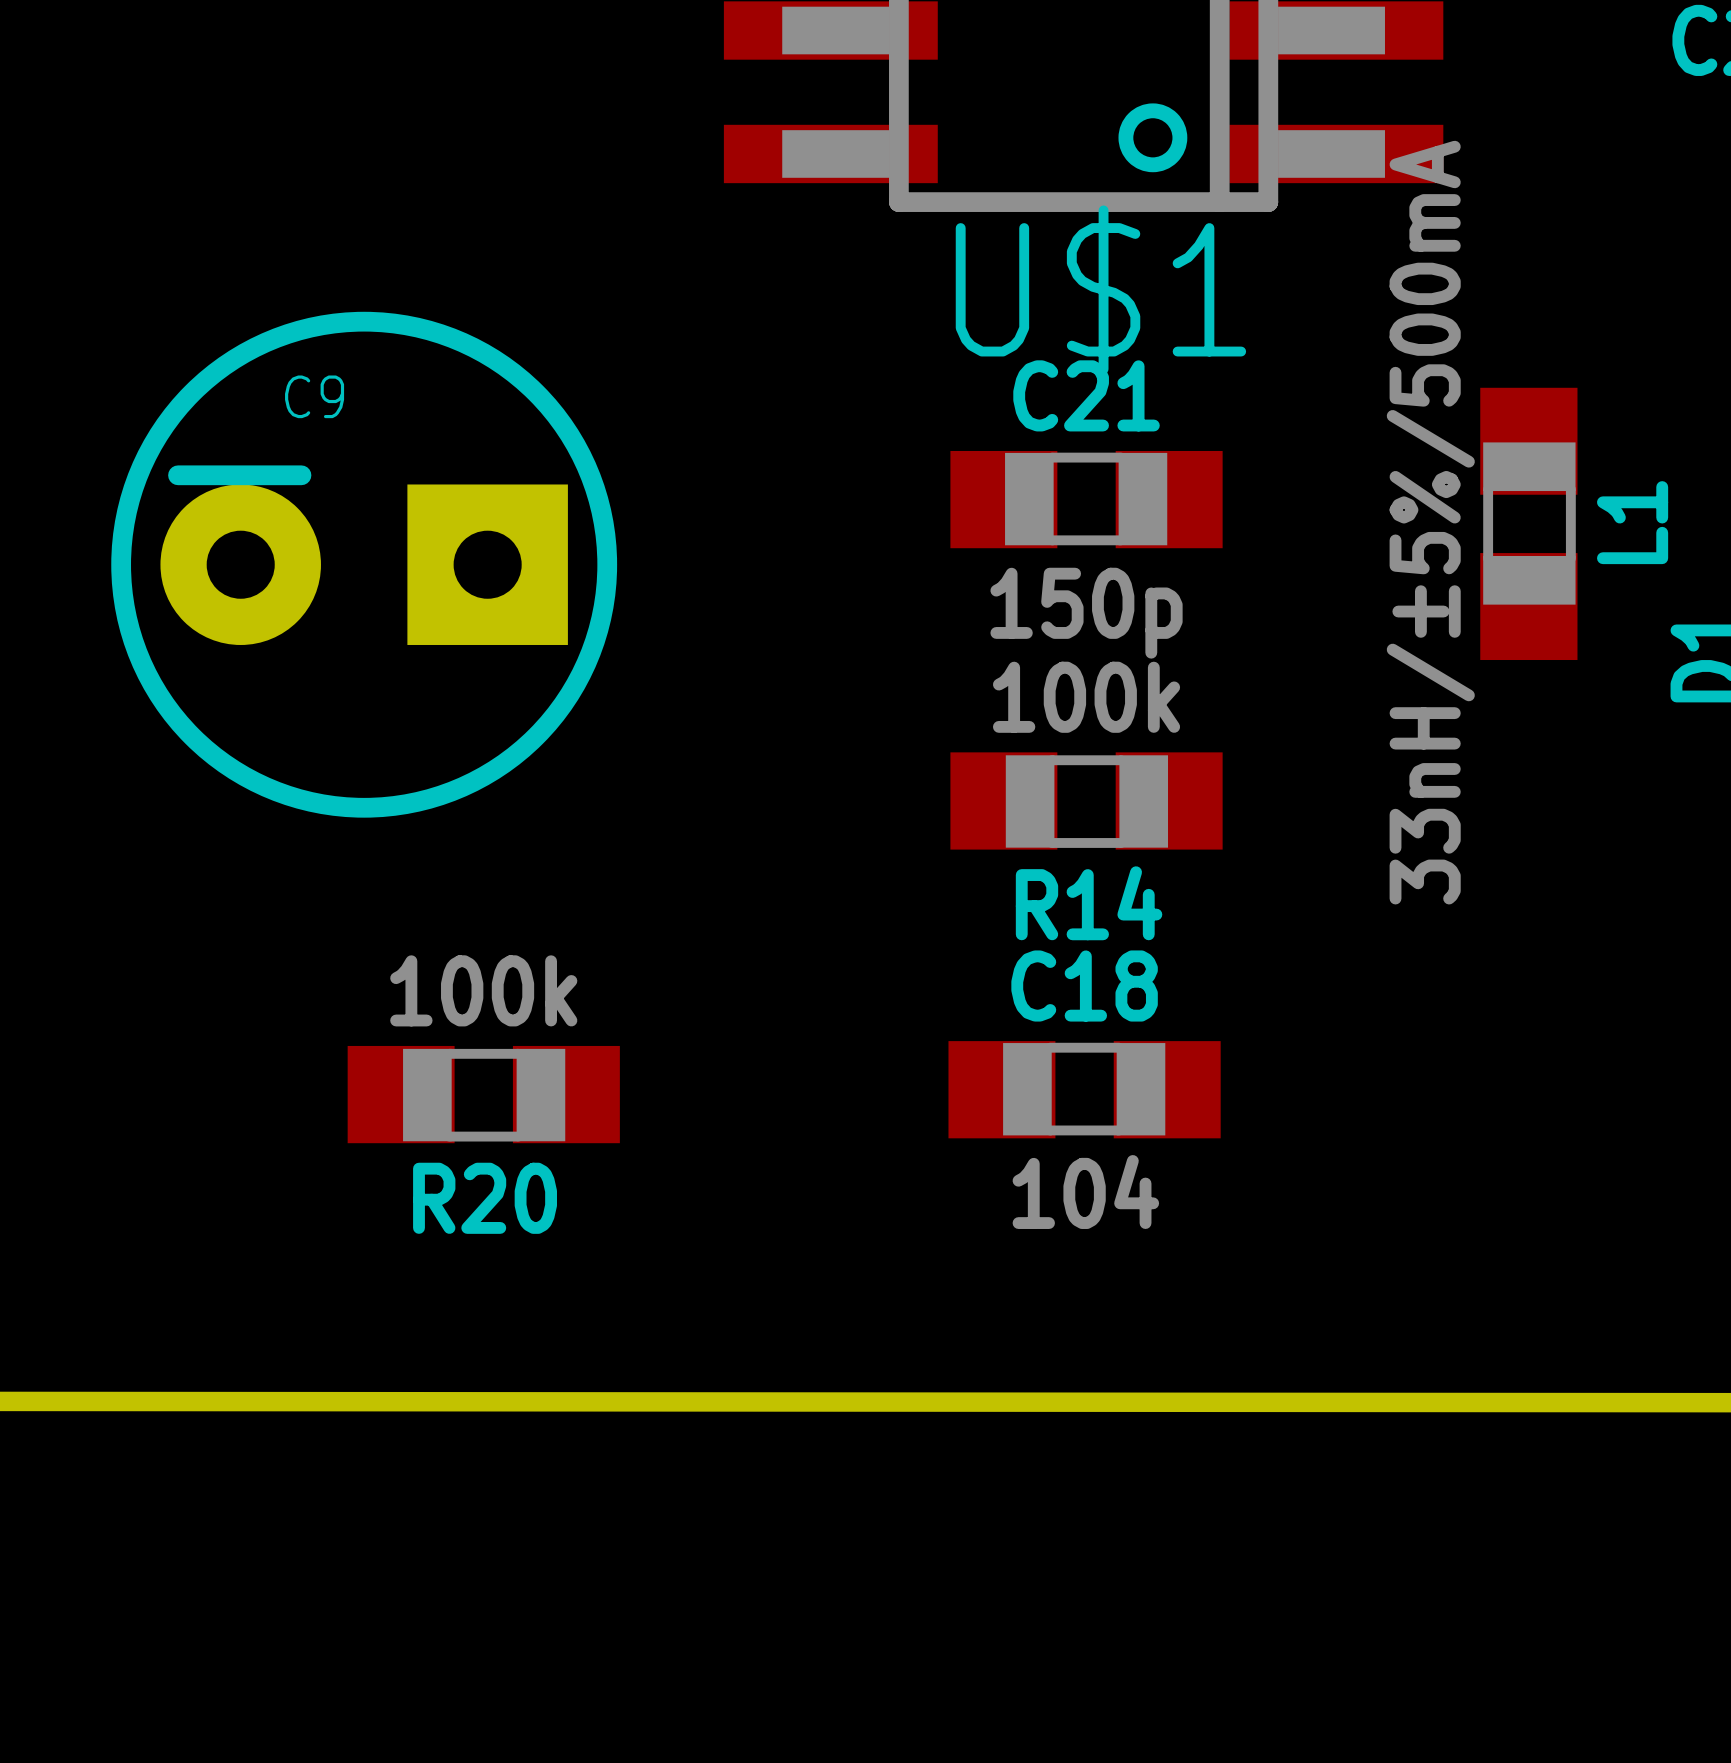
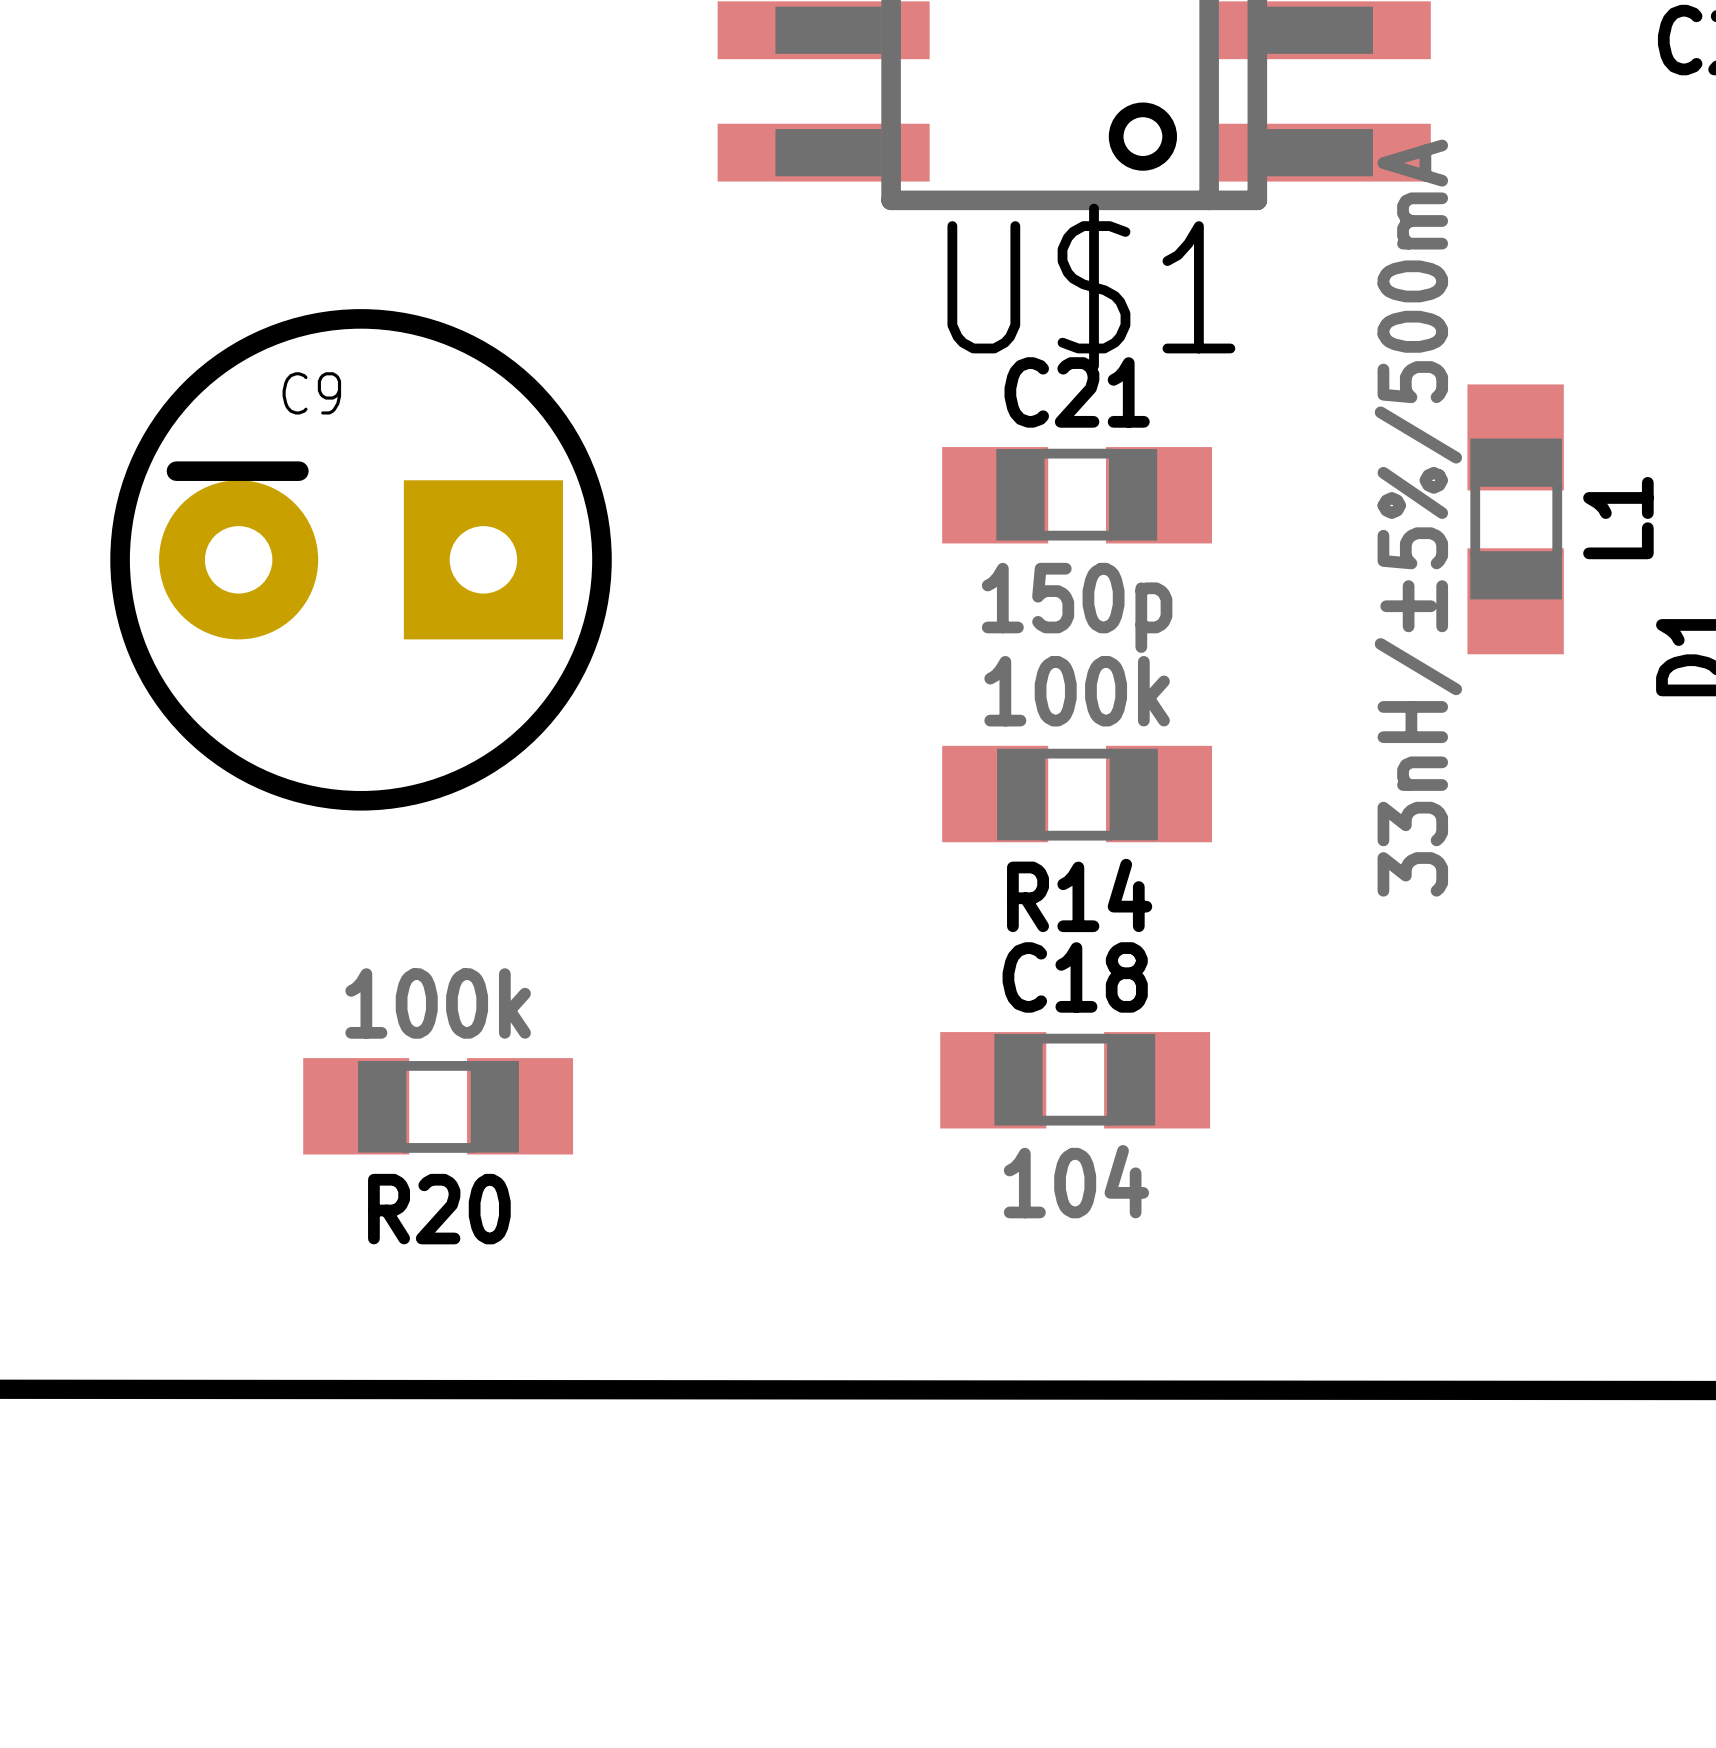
R20 position: (483, 1094) -> (438, 1106)

